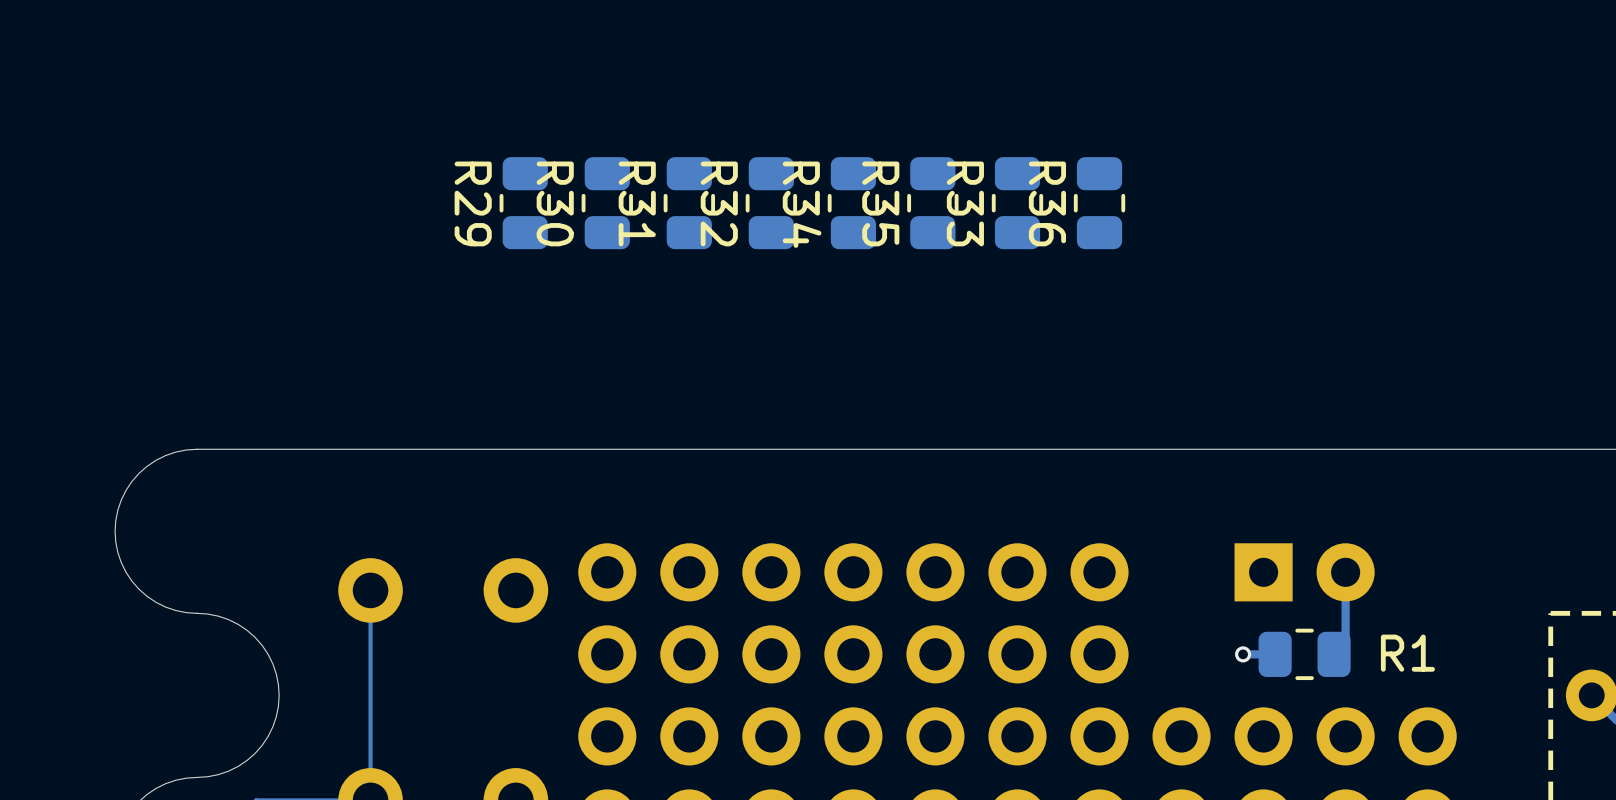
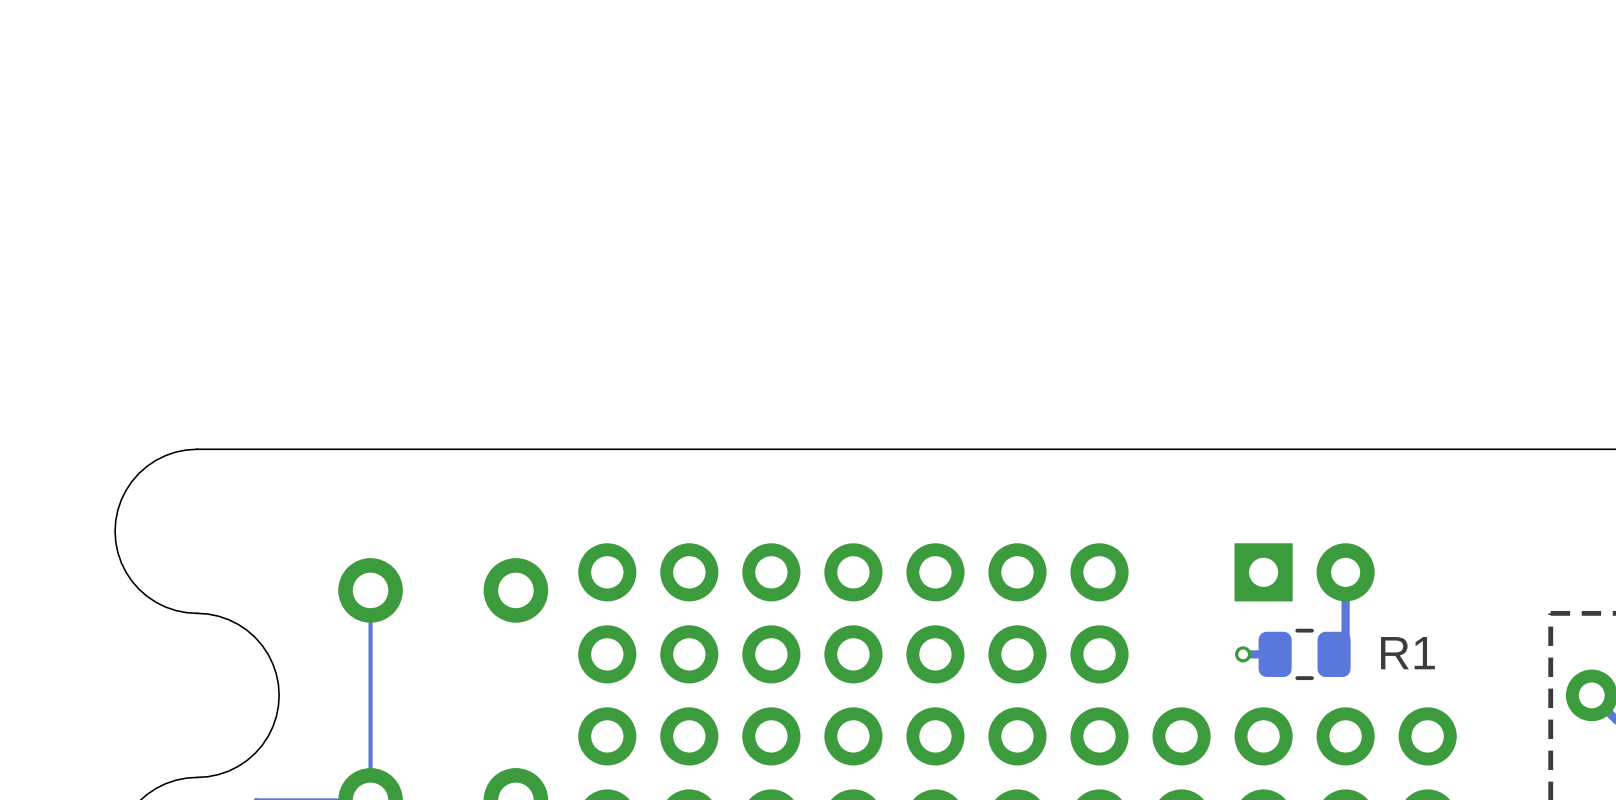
R29: (525, 203) -> none
R30: (607, 203) -> none
R31: (689, 203) -> none
R32: (771, 203) -> none
R34: (853, 203) -> none
R35: (932, 203) -> none
R33: (1017, 203) -> none
R36: (1099, 203) -> none

